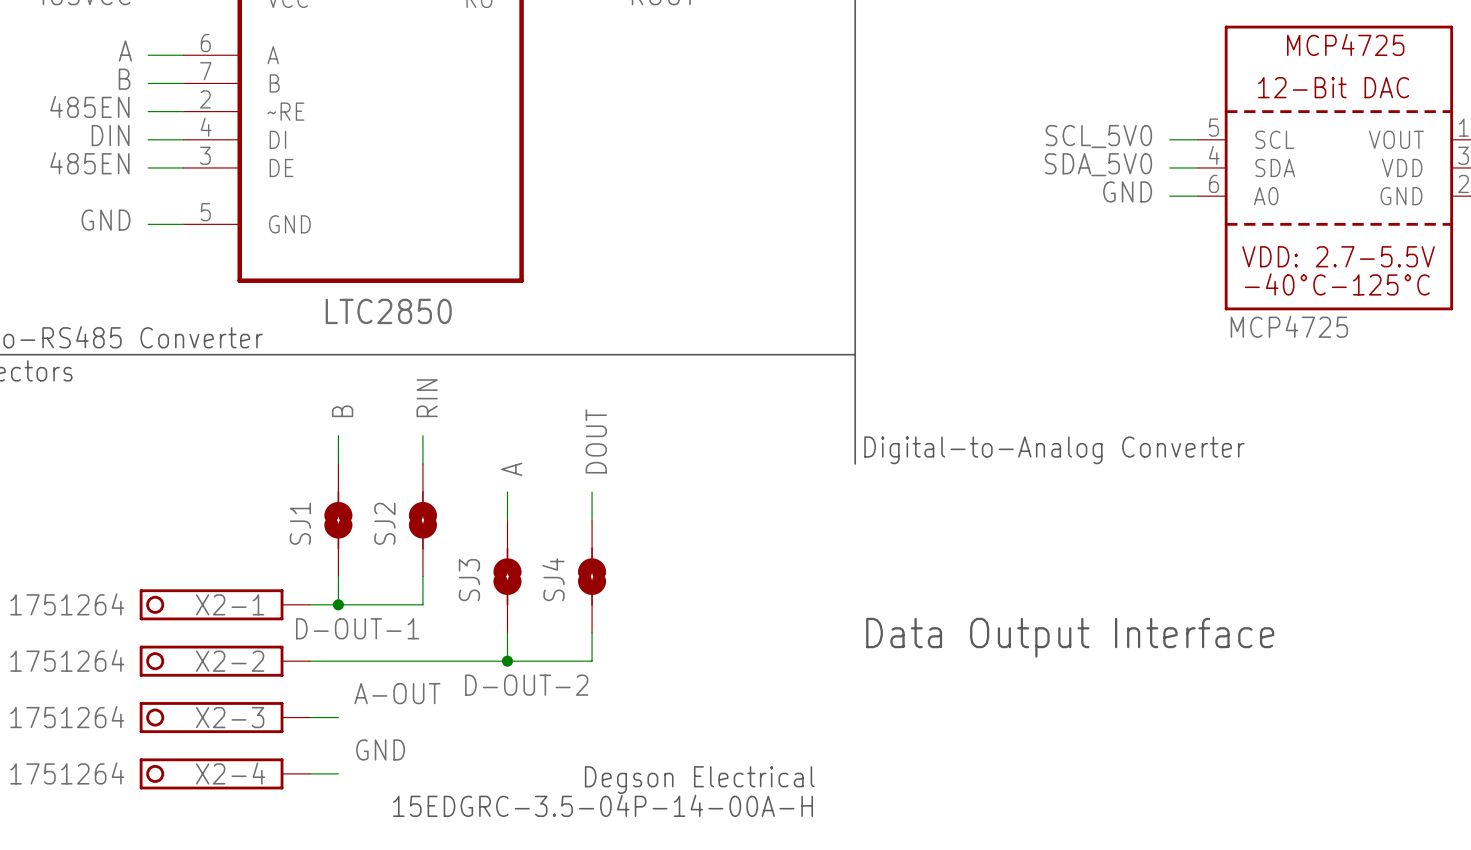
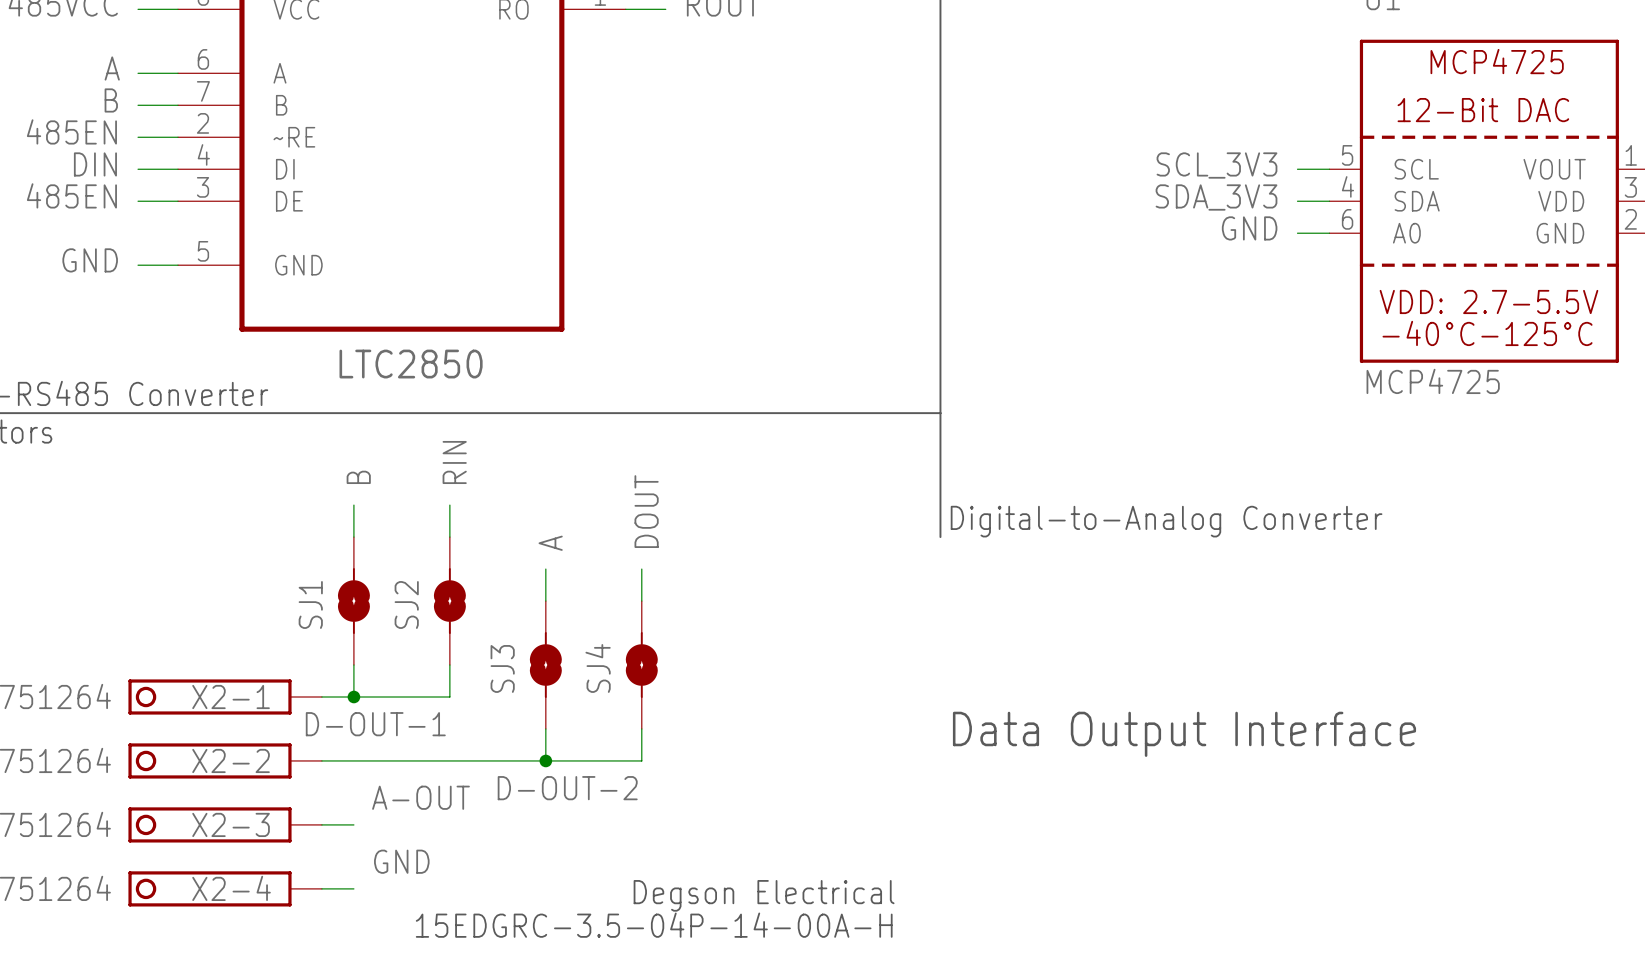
label: SCL_5V0 (1098, 136) -> SCL_3V3 (1216, 165)
label: SDA_5V0 (1098, 164) -> SDA_3V3 (1216, 197)

